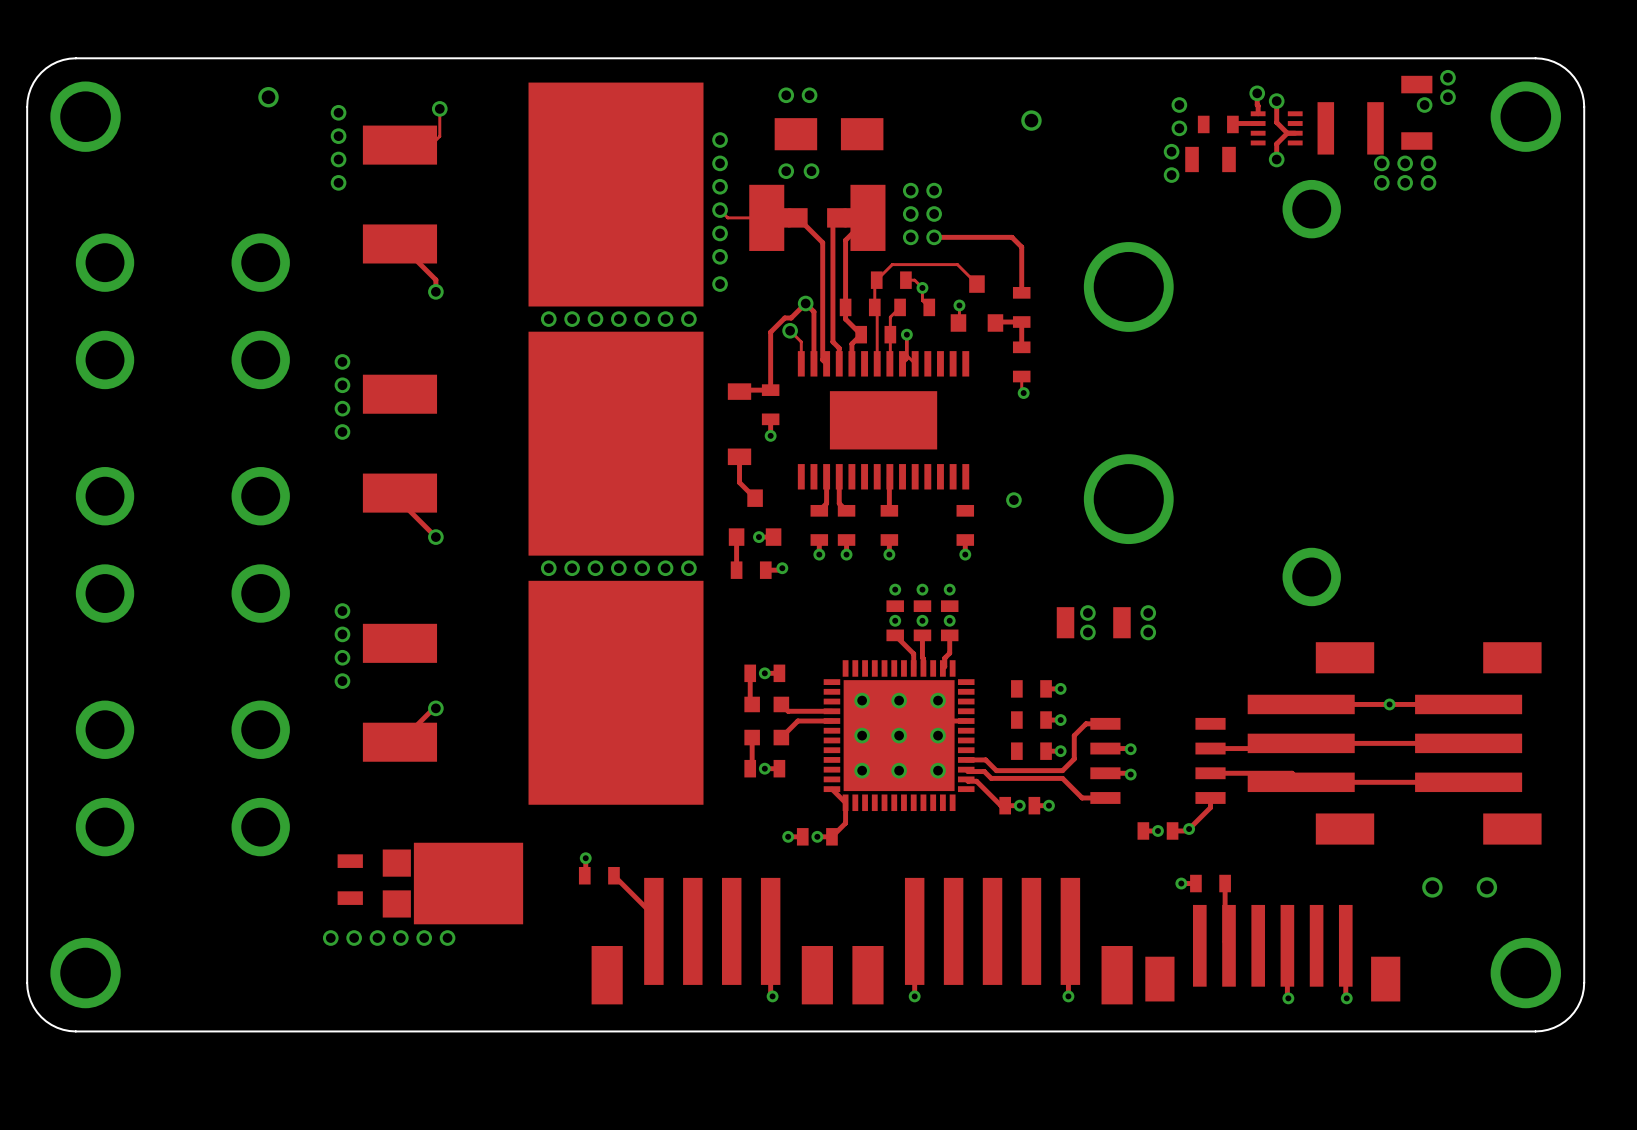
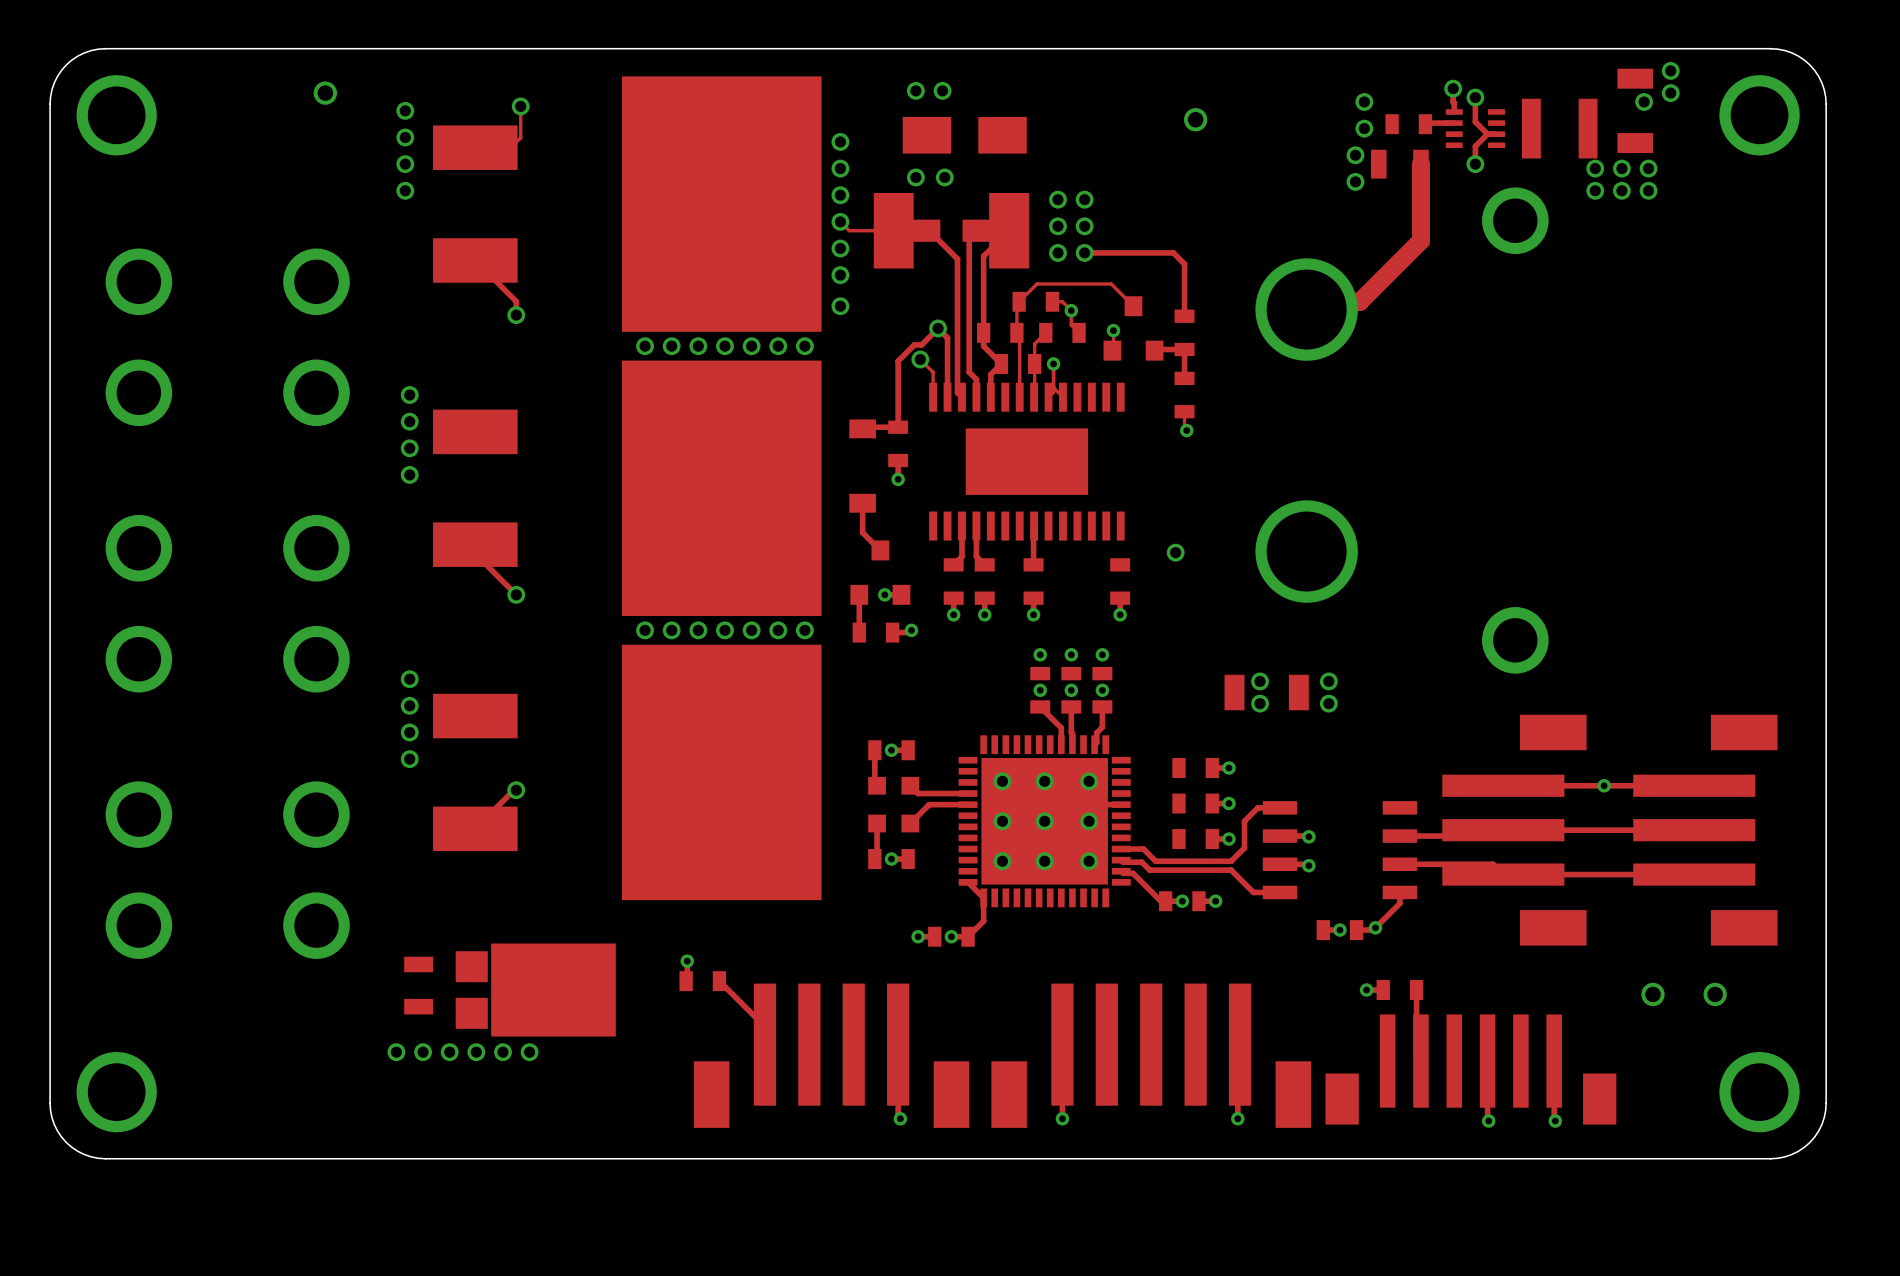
top track: none -> (1420, 164) (1420, 240) (1359, 301) (1314, 301) (1306, 309)

